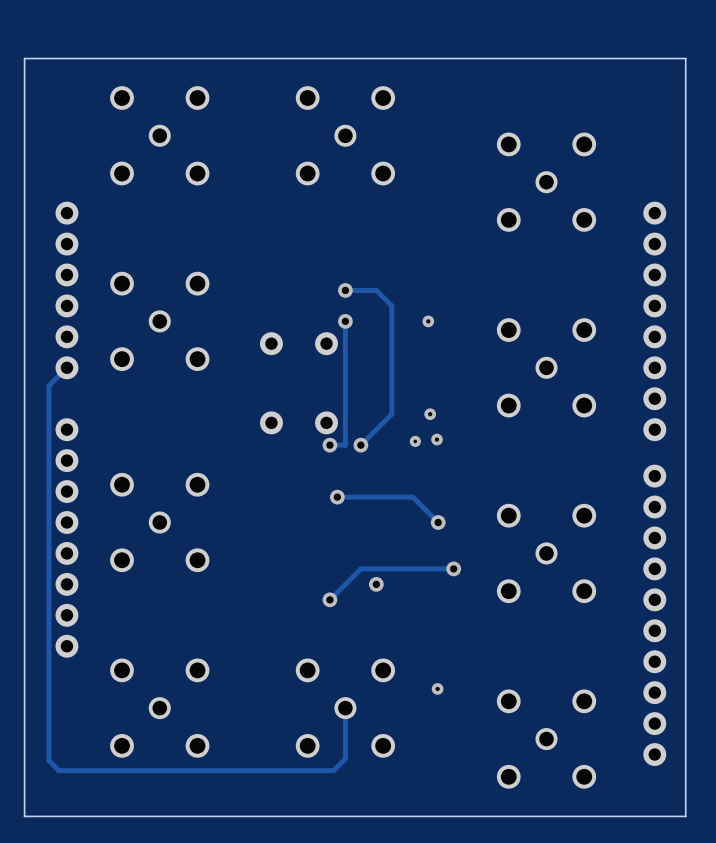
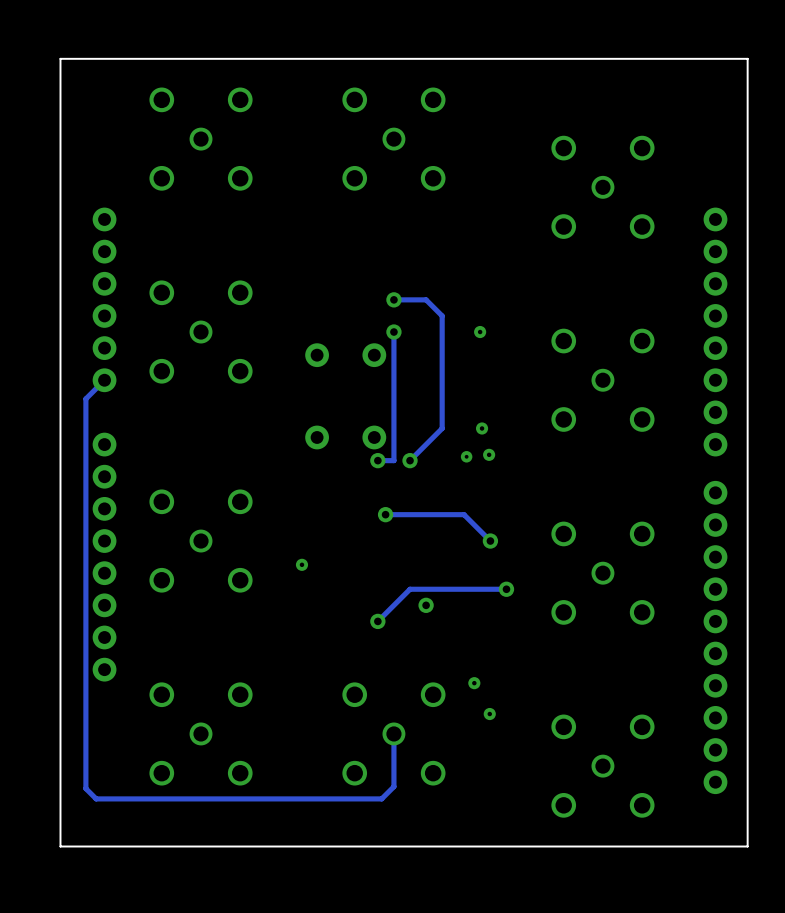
via: none -> (301, 564)
via: none -> (474, 683)

